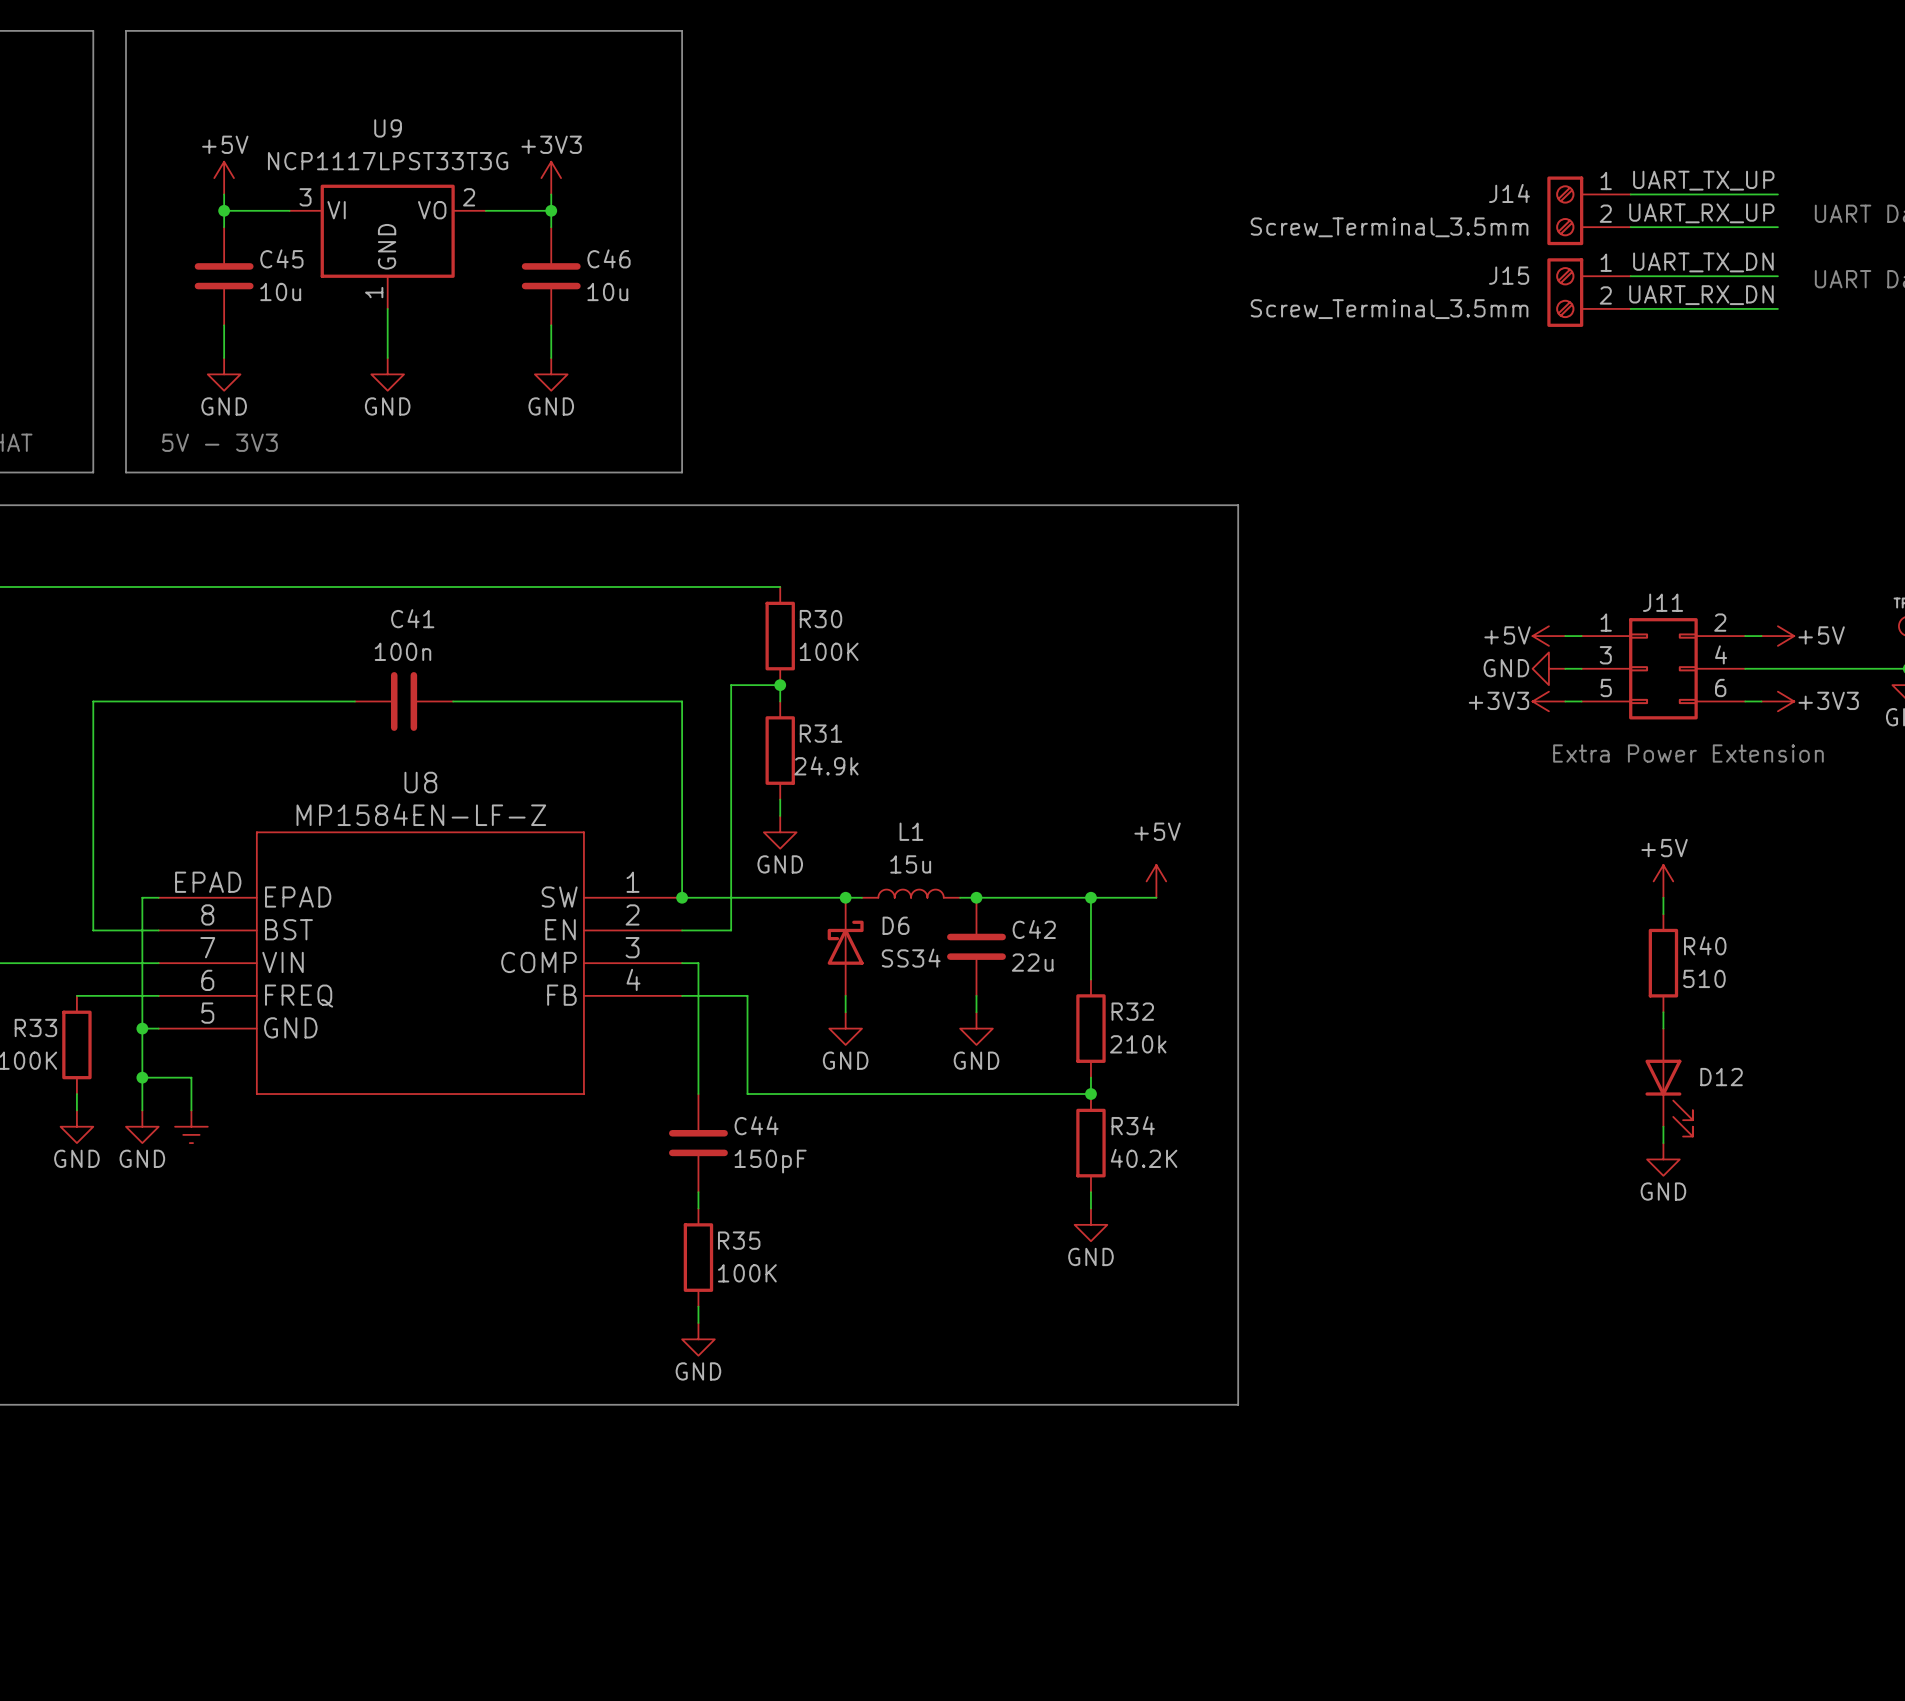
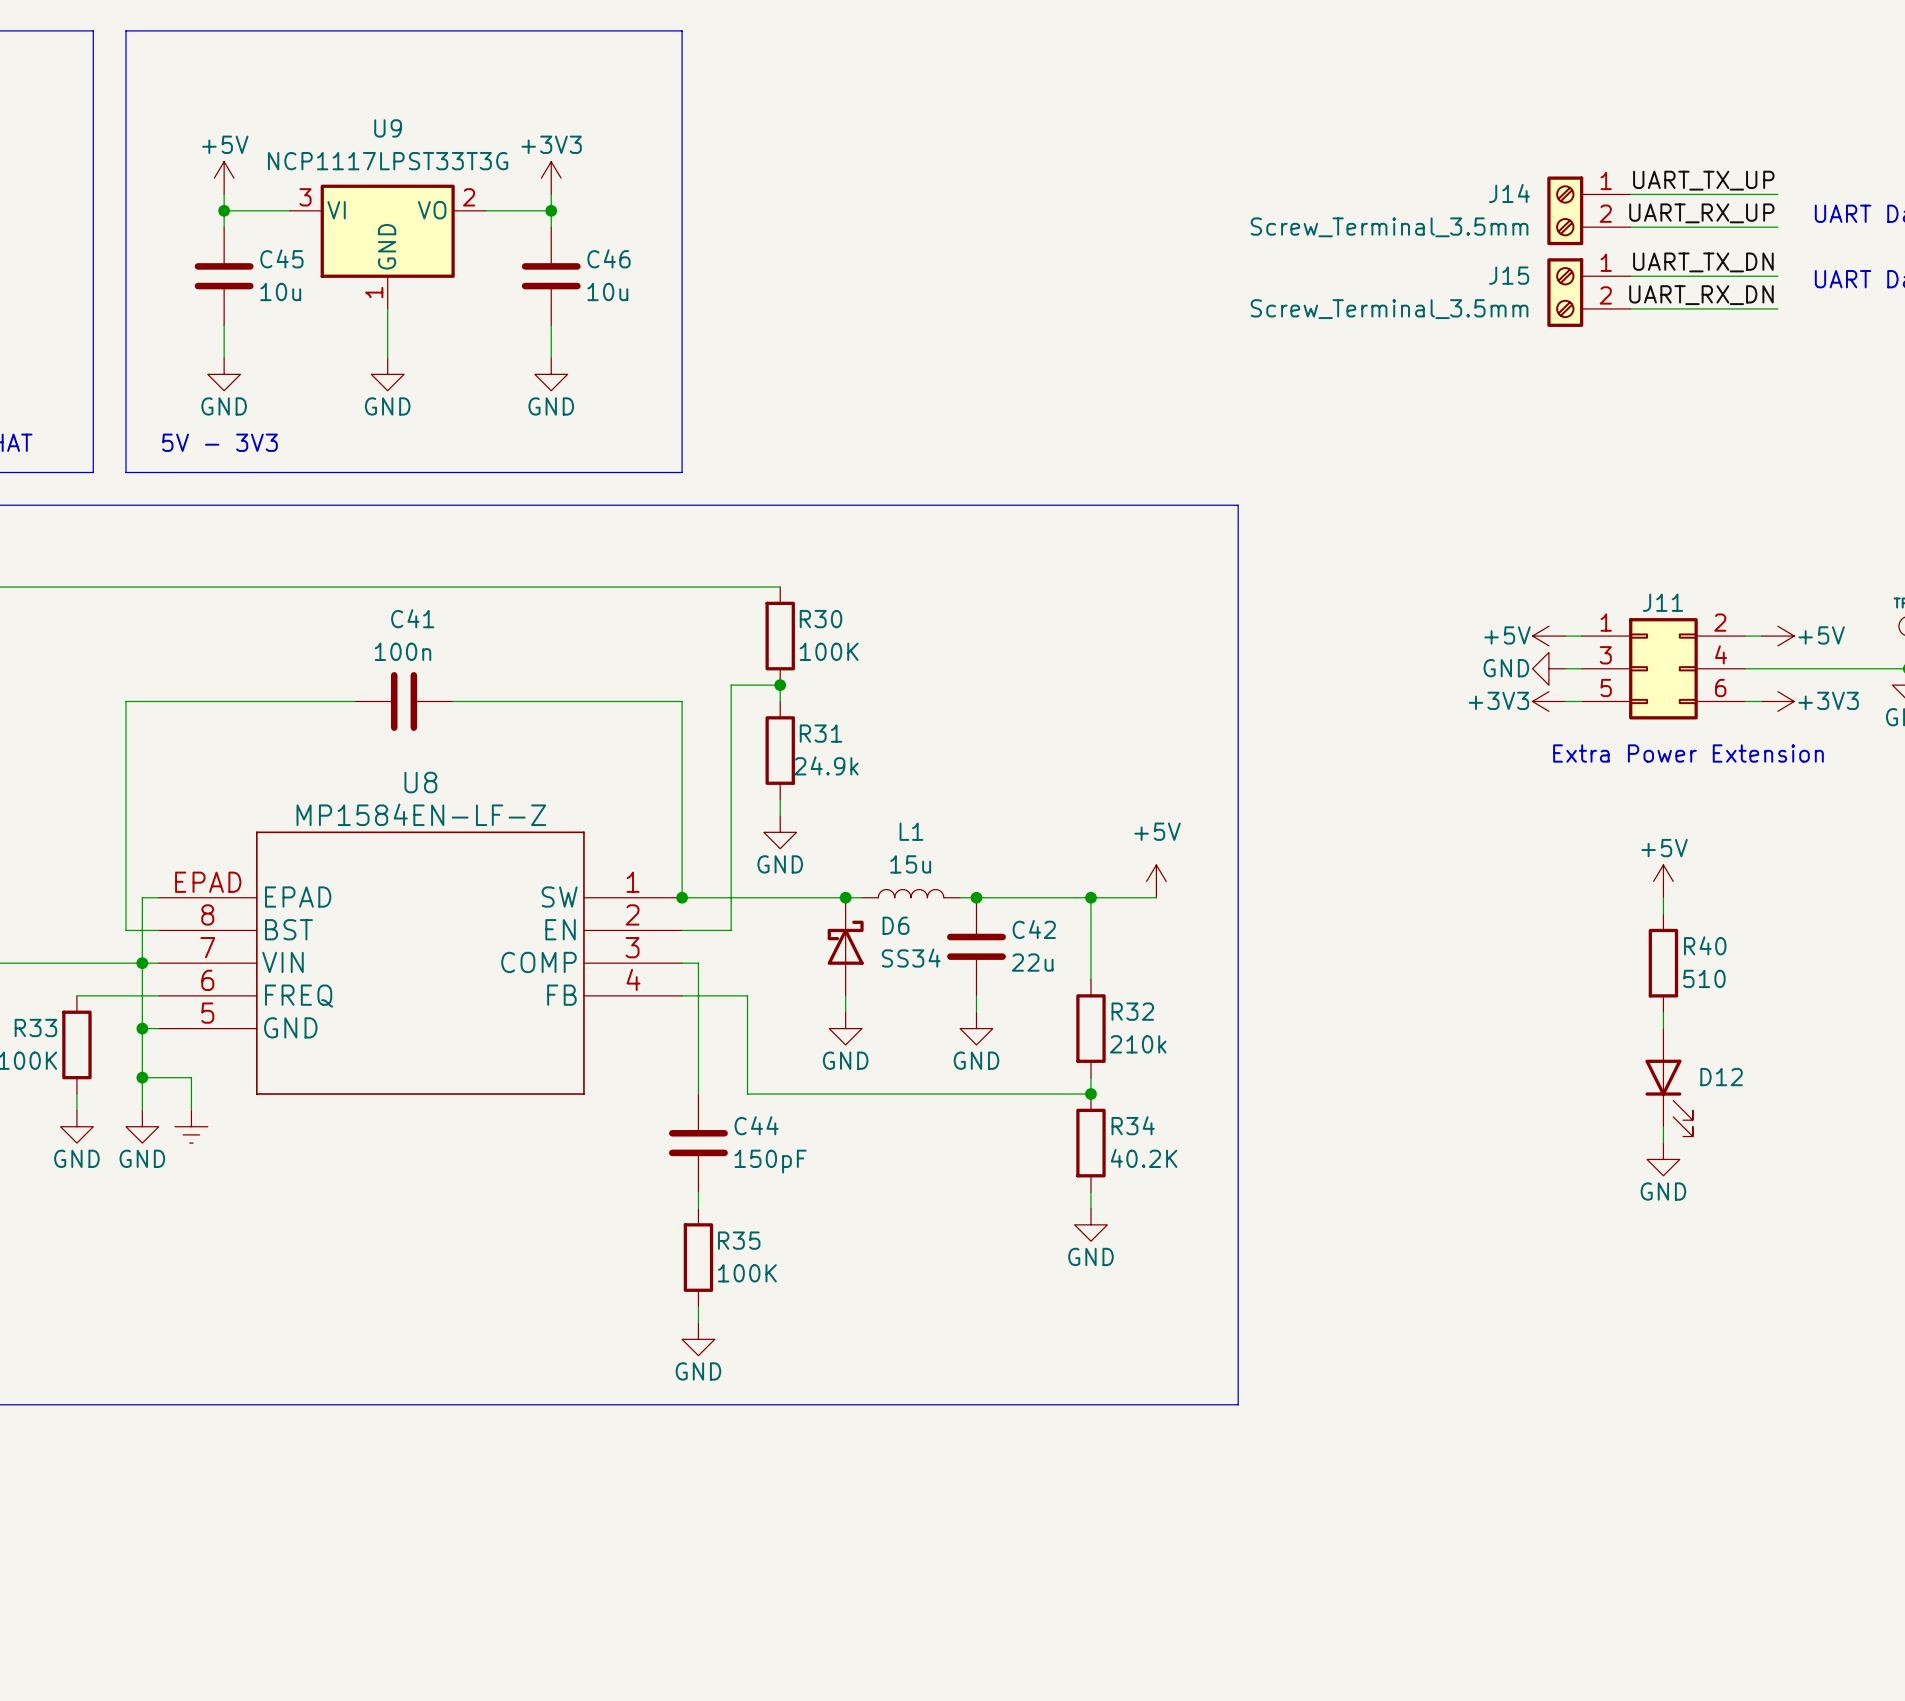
wire: (126, 701) (93, 701) (93, 930) (126, 930) -> (126, 701) (126, 930)
junction: none -> (142, 963)

